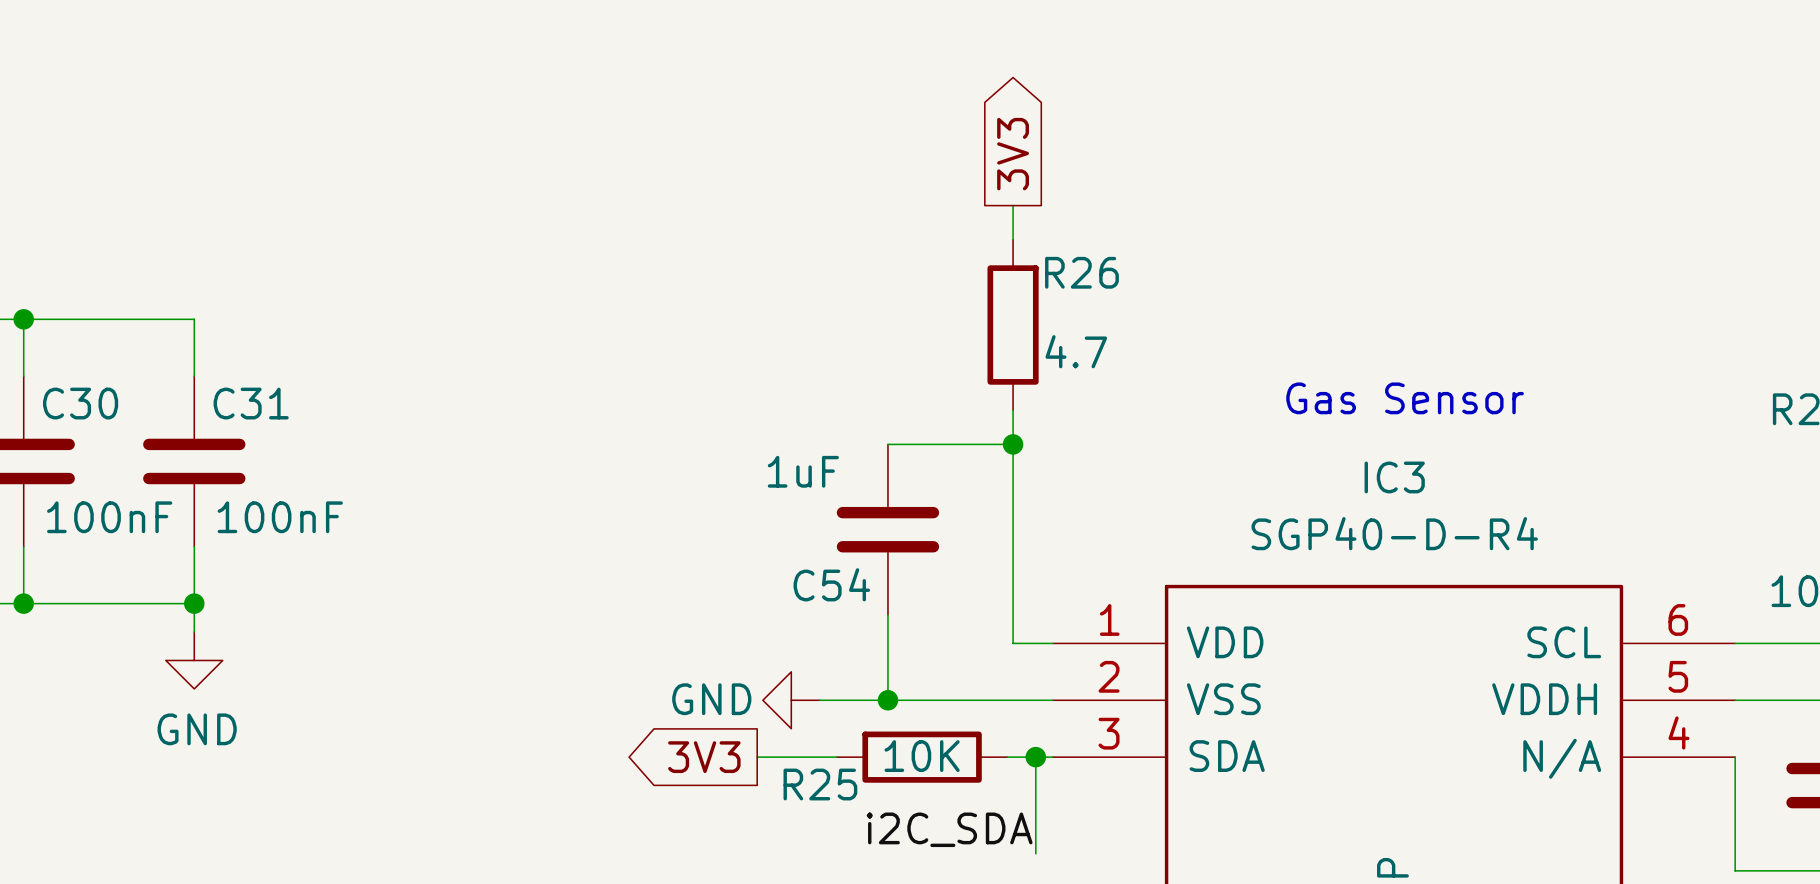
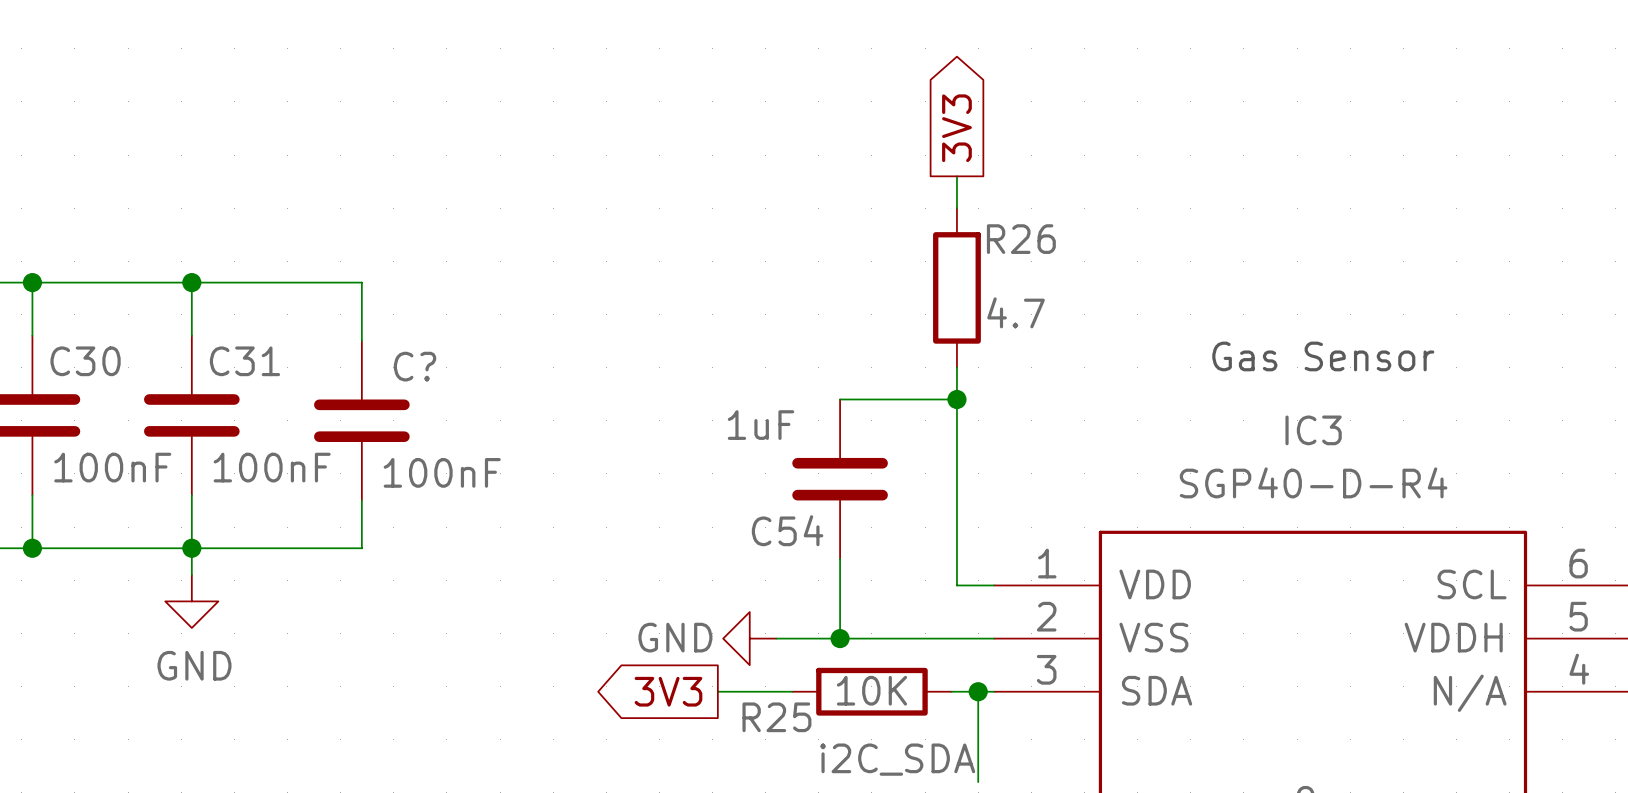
wire: none -> (191, 282) (361, 282) (361, 341)
junction: none -> (191, 282)
C?: none -> 100nF (361, 420)
wire: none -> (361, 500) (361, 548) (191, 548)

